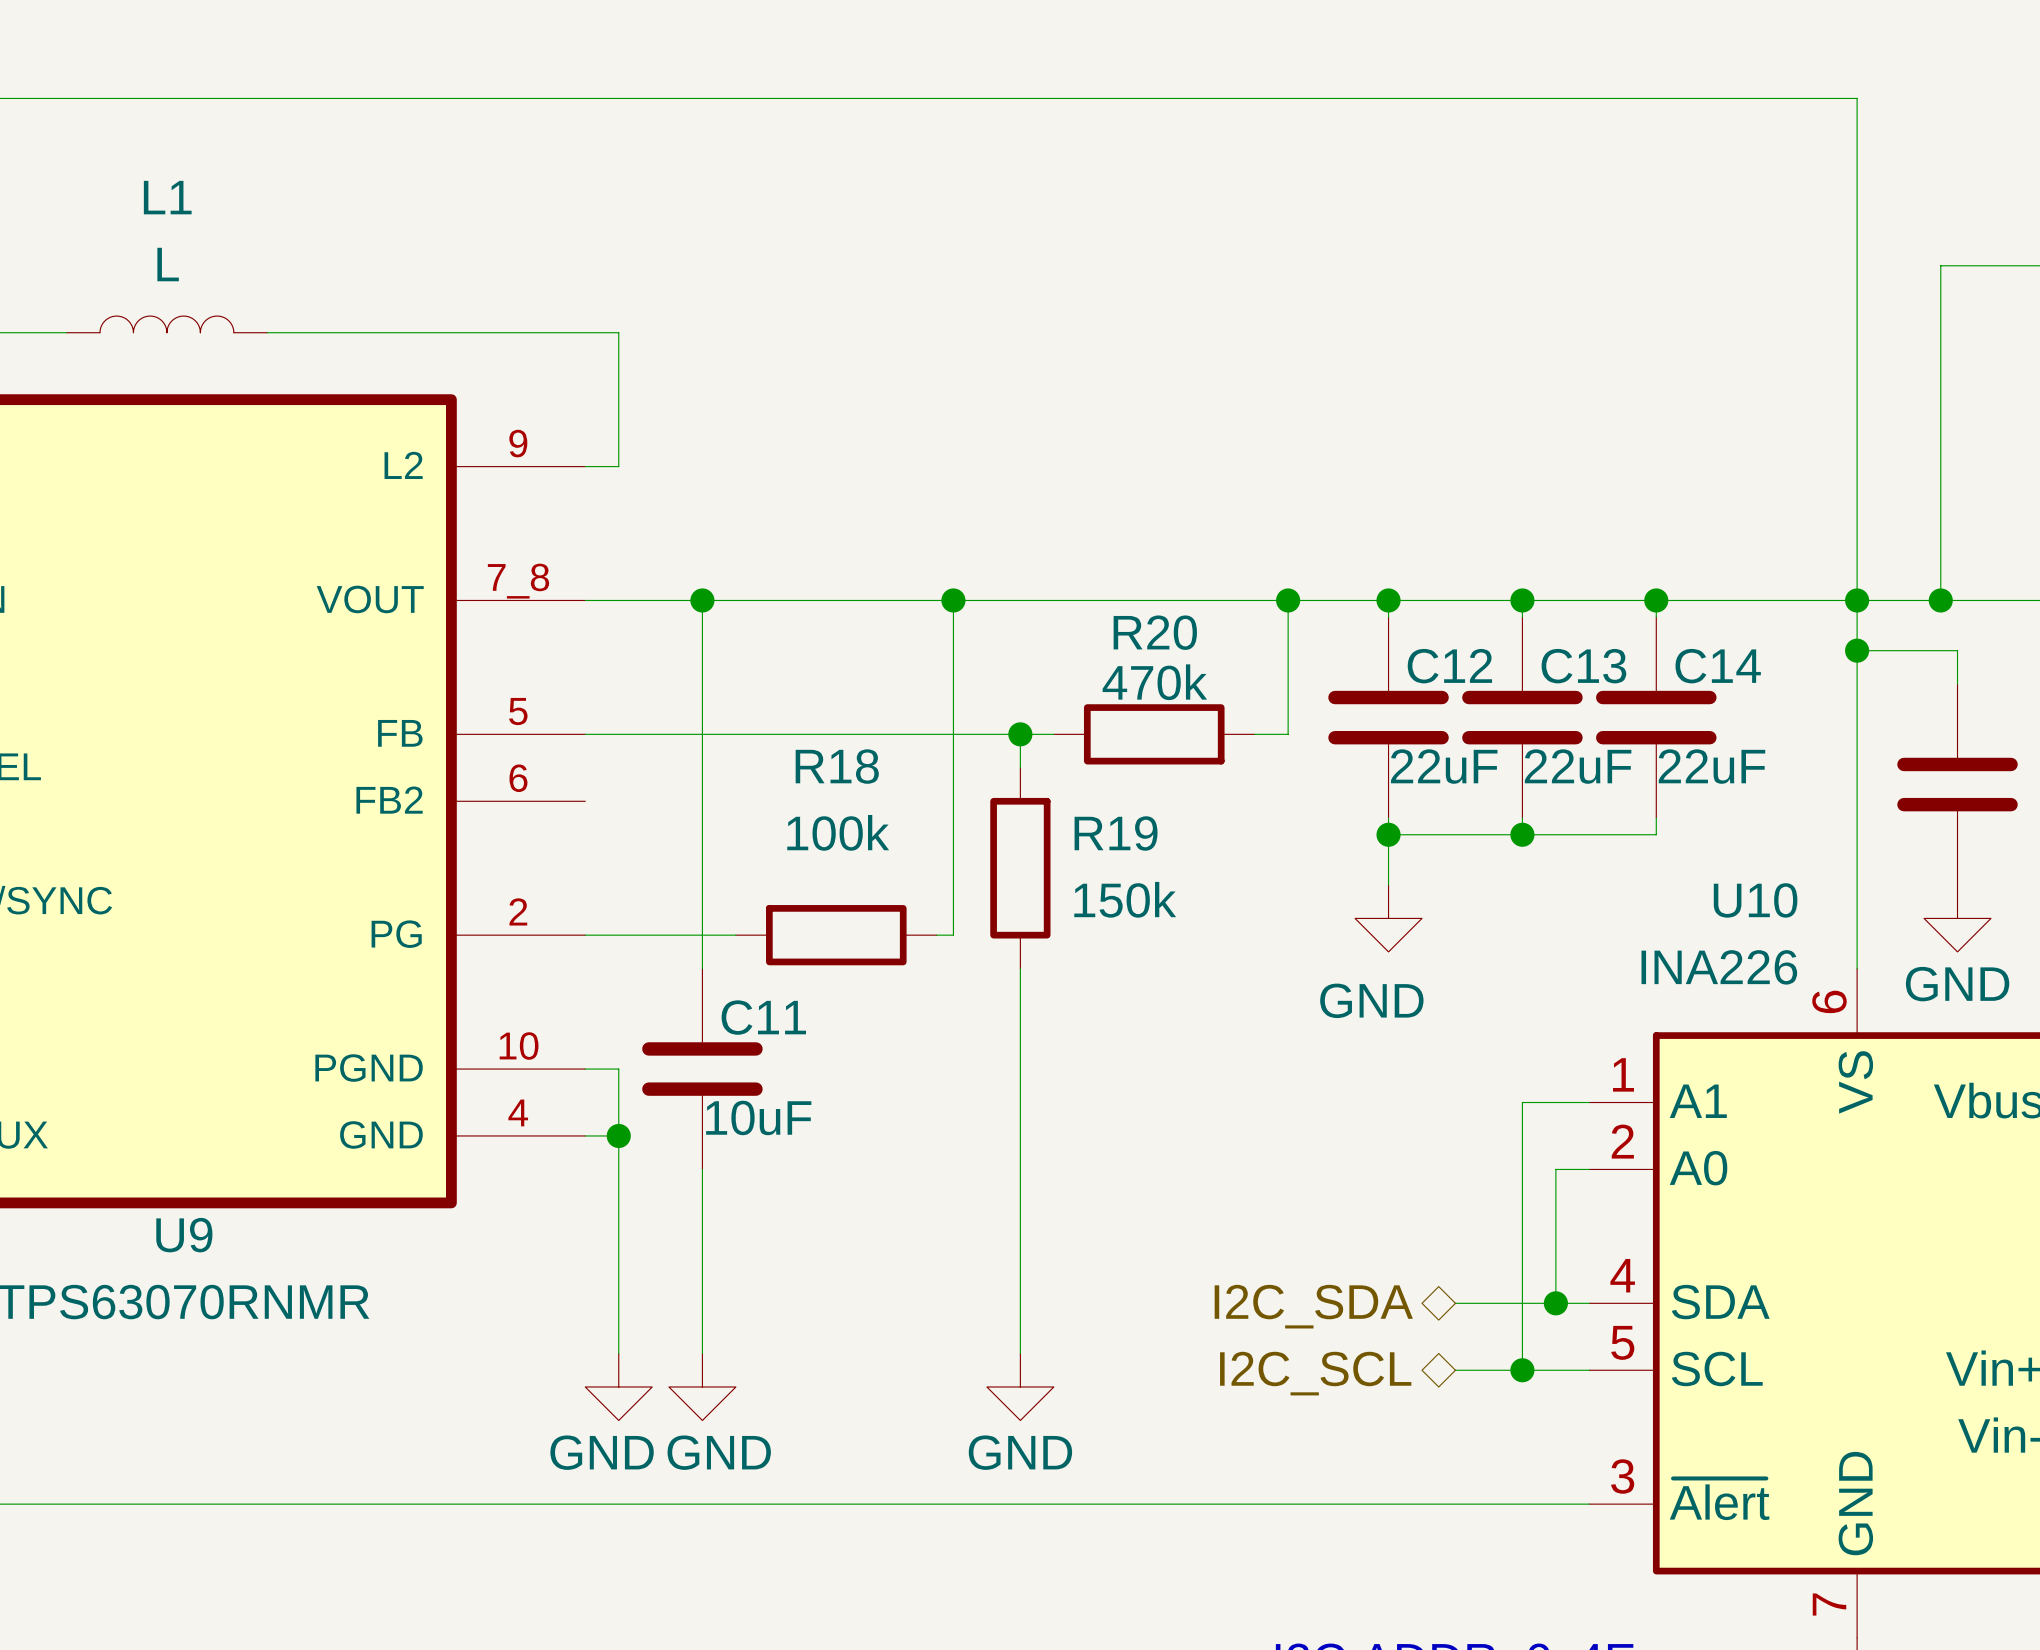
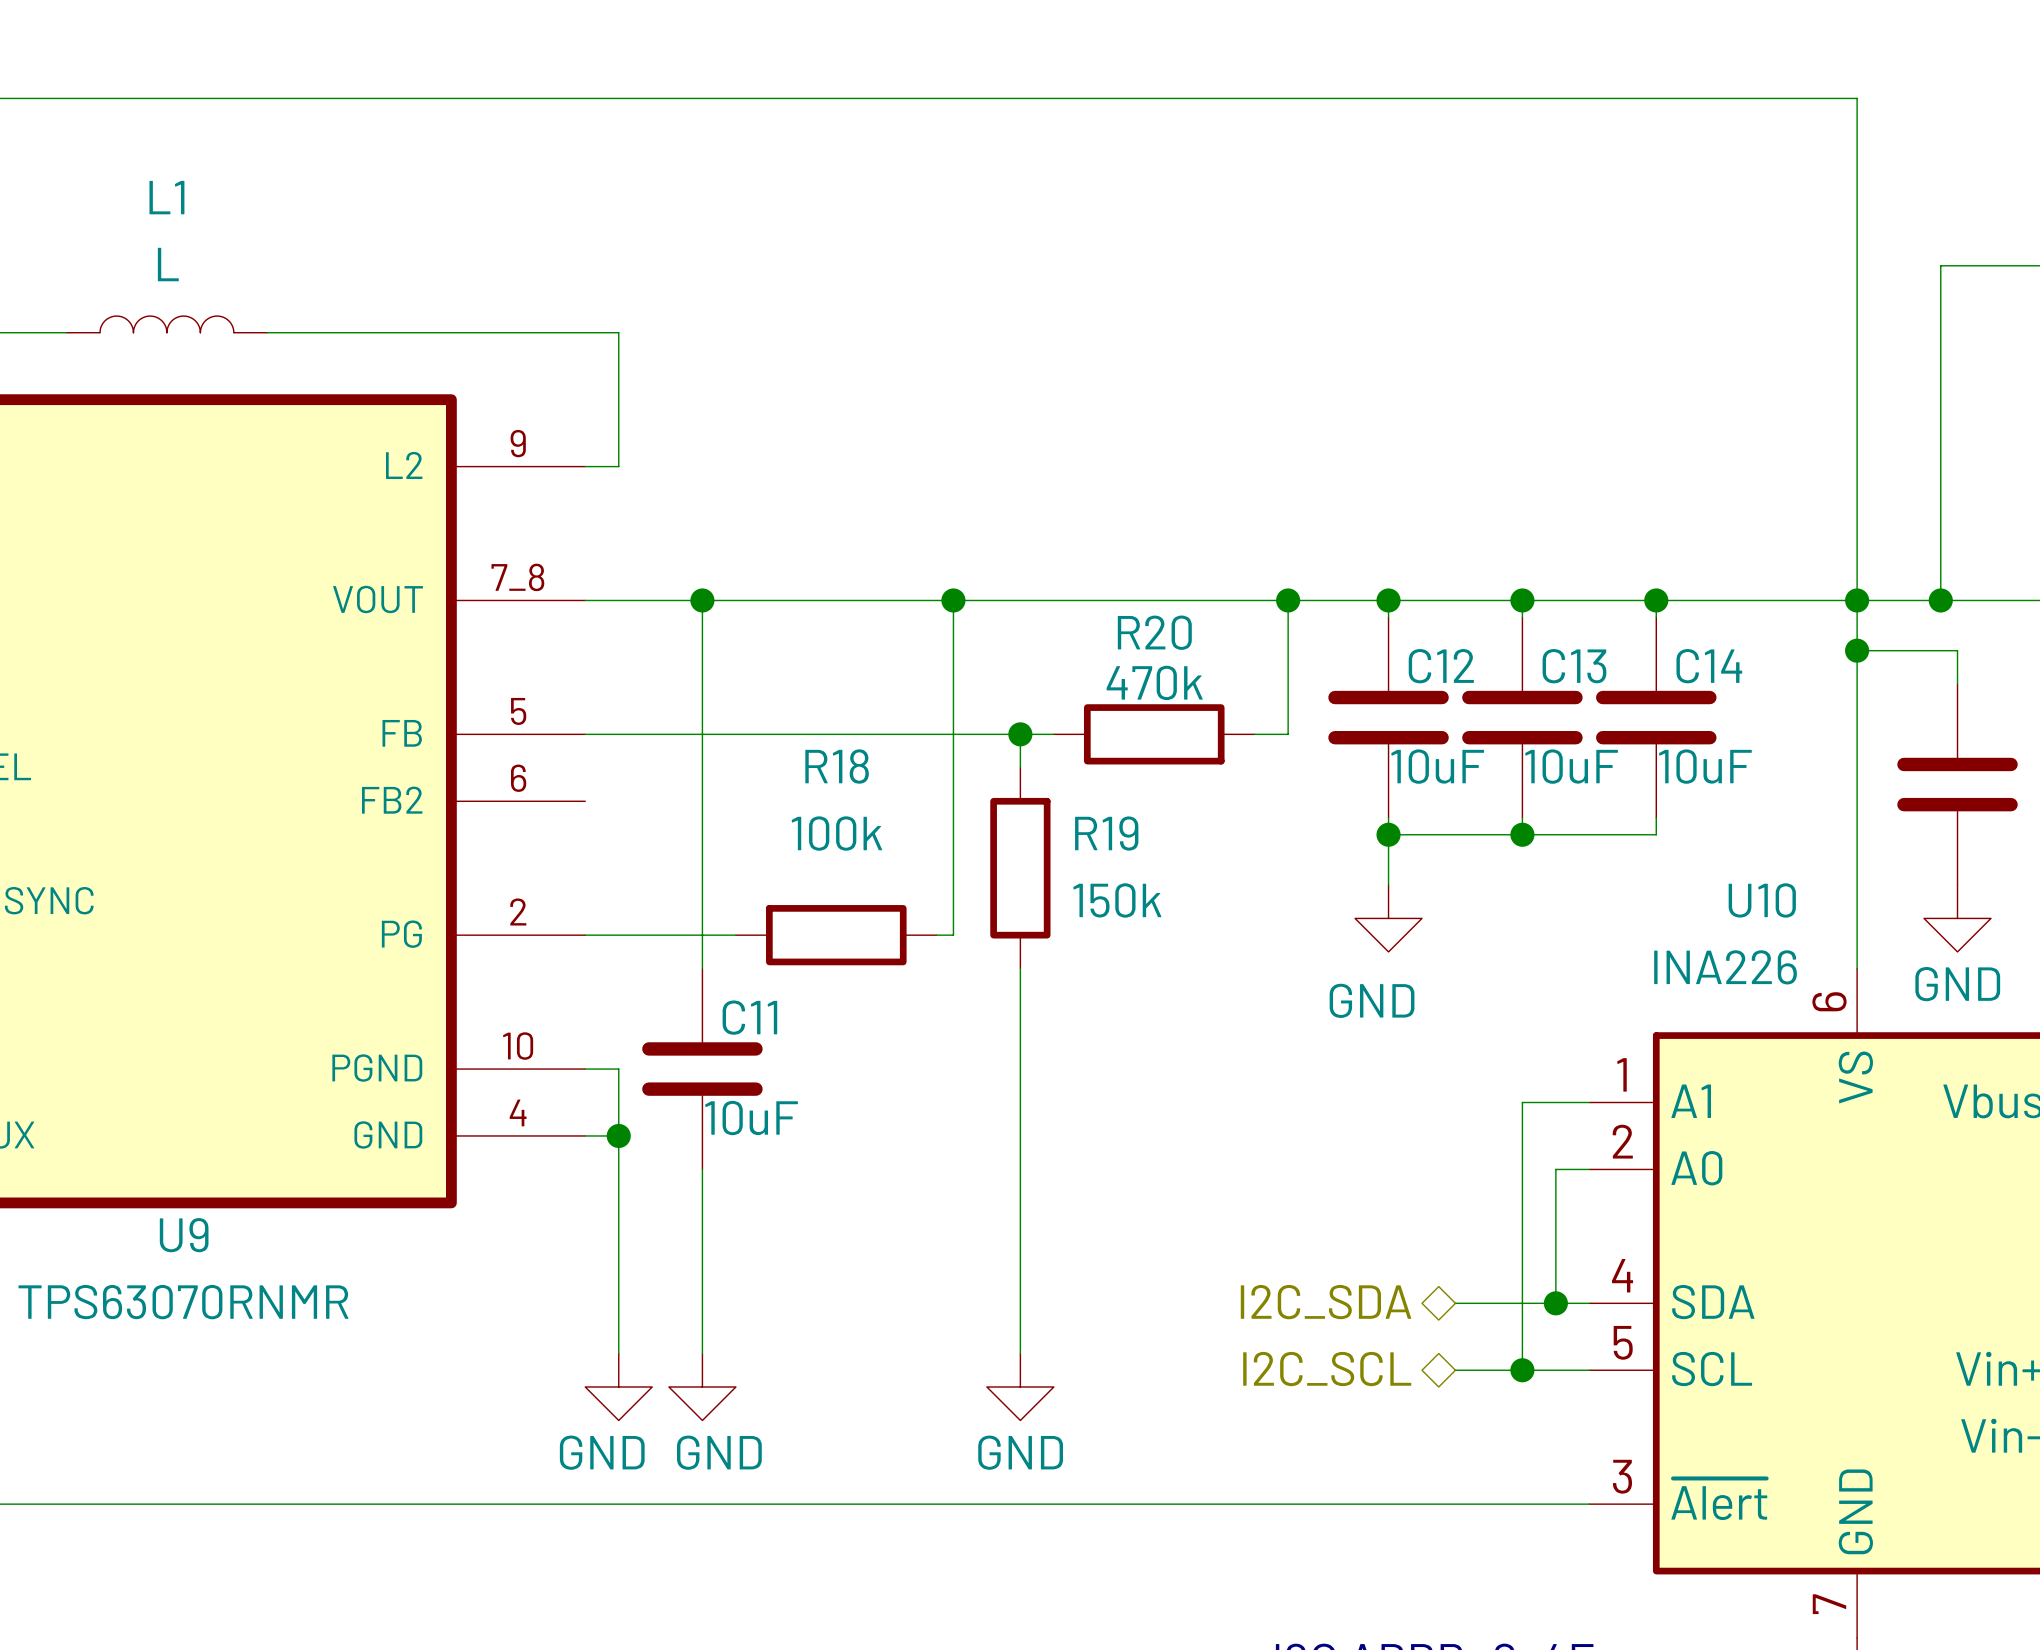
C12 value: 22uF (1444, 766) -> 10uF (1437, 766)
C13 value: 22uF (1578, 766) -> 10uF (1571, 766)
C14 value: 22uF (1711, 766) -> 10uF (1705, 766)

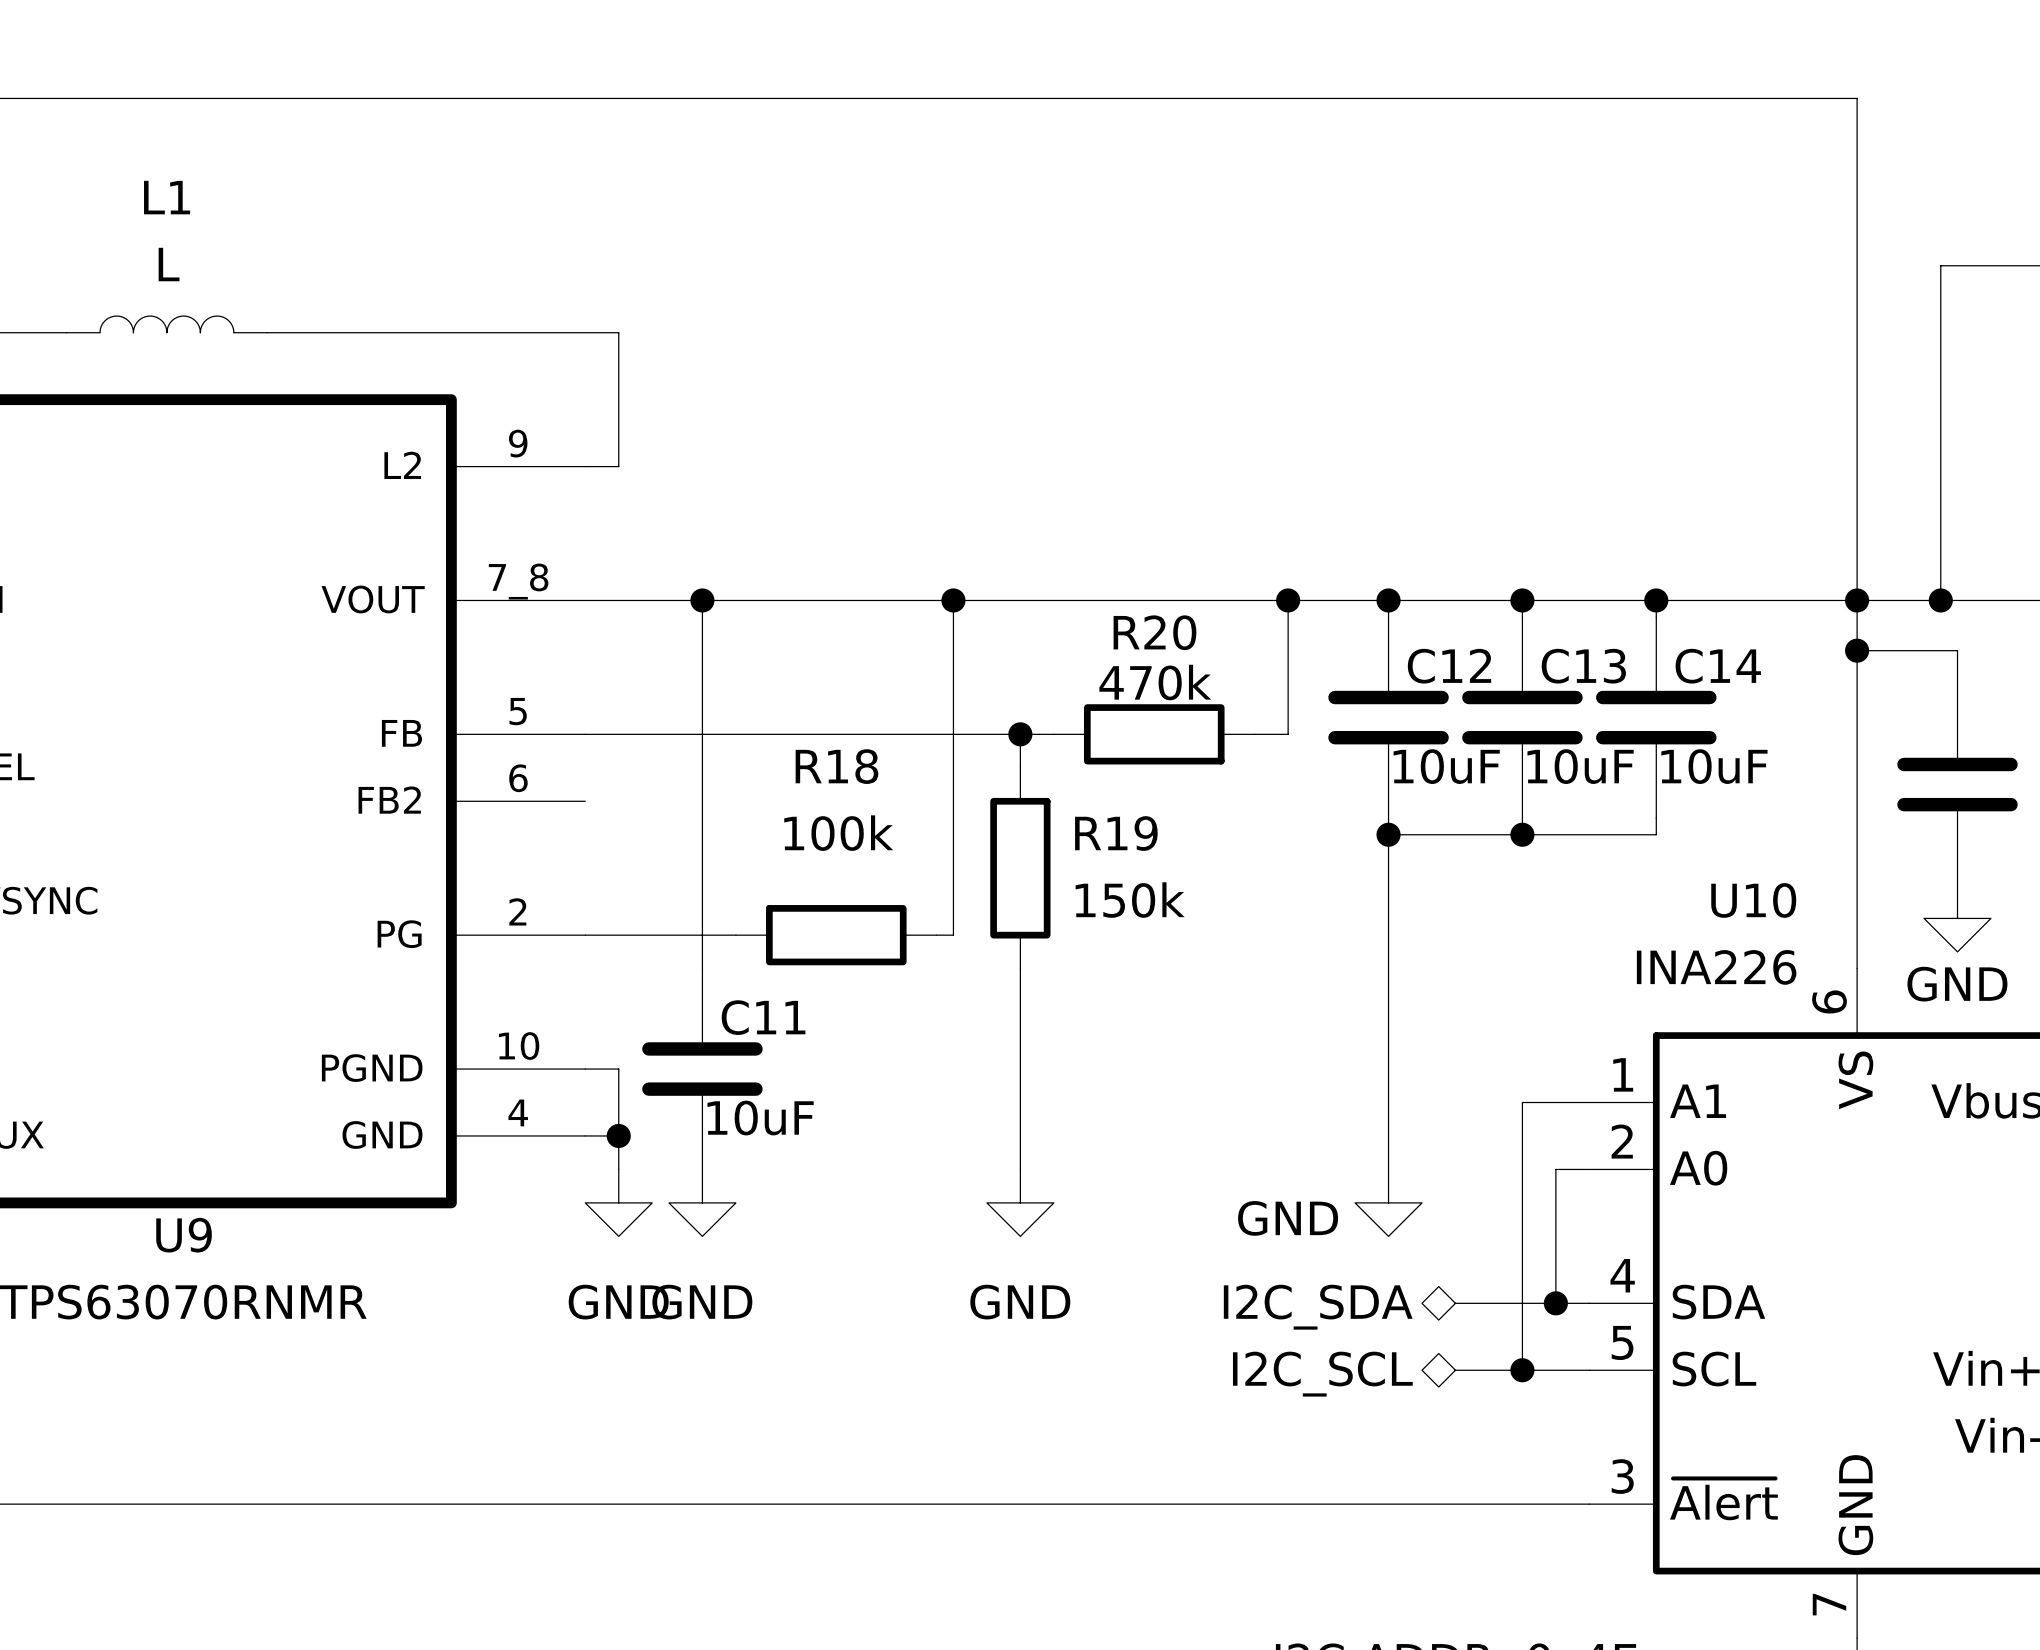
wire: none -> (1388, 884) (1388, 1169)
power symbol: GND (1388, 918) -> none
wire: (618, 1169) (618, 1353) -> none
wire: (702, 1169) (702, 1353) -> none
wire: (1020, 1169) (1020, 1353) -> none
power symbol: none -> GND (618, 1202)
power symbol: none -> GND (702, 1202)
power symbol: none -> GND (1020, 1202)
power symbol: none -> GND (1388, 1202)
power symbol: GND (618, 1386) -> none
power symbol: GND (702, 1386) -> none
power symbol: GND (1020, 1386) -> none

